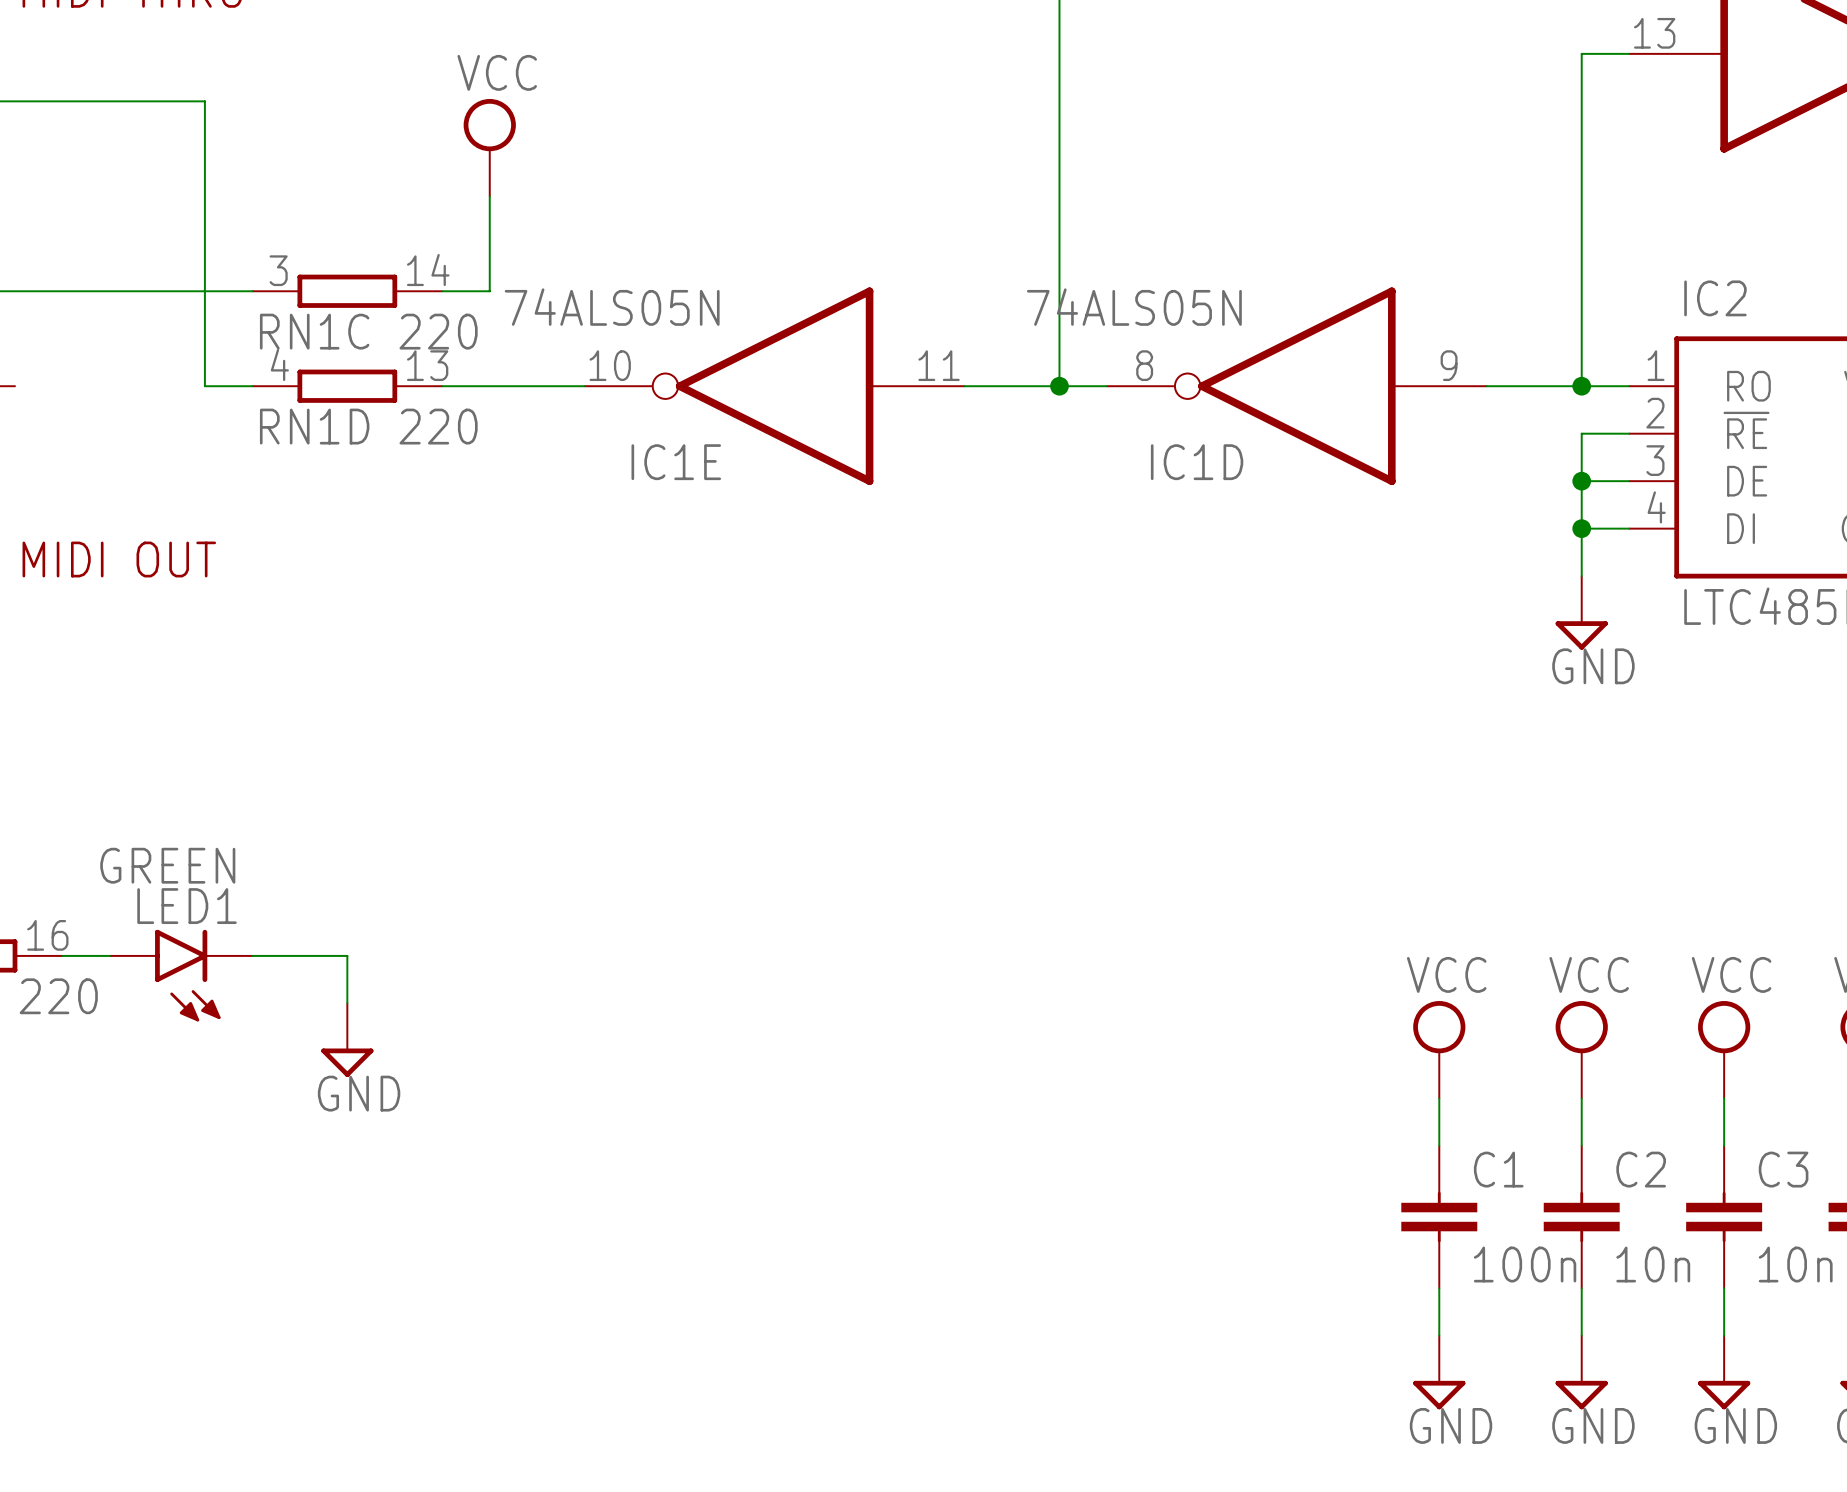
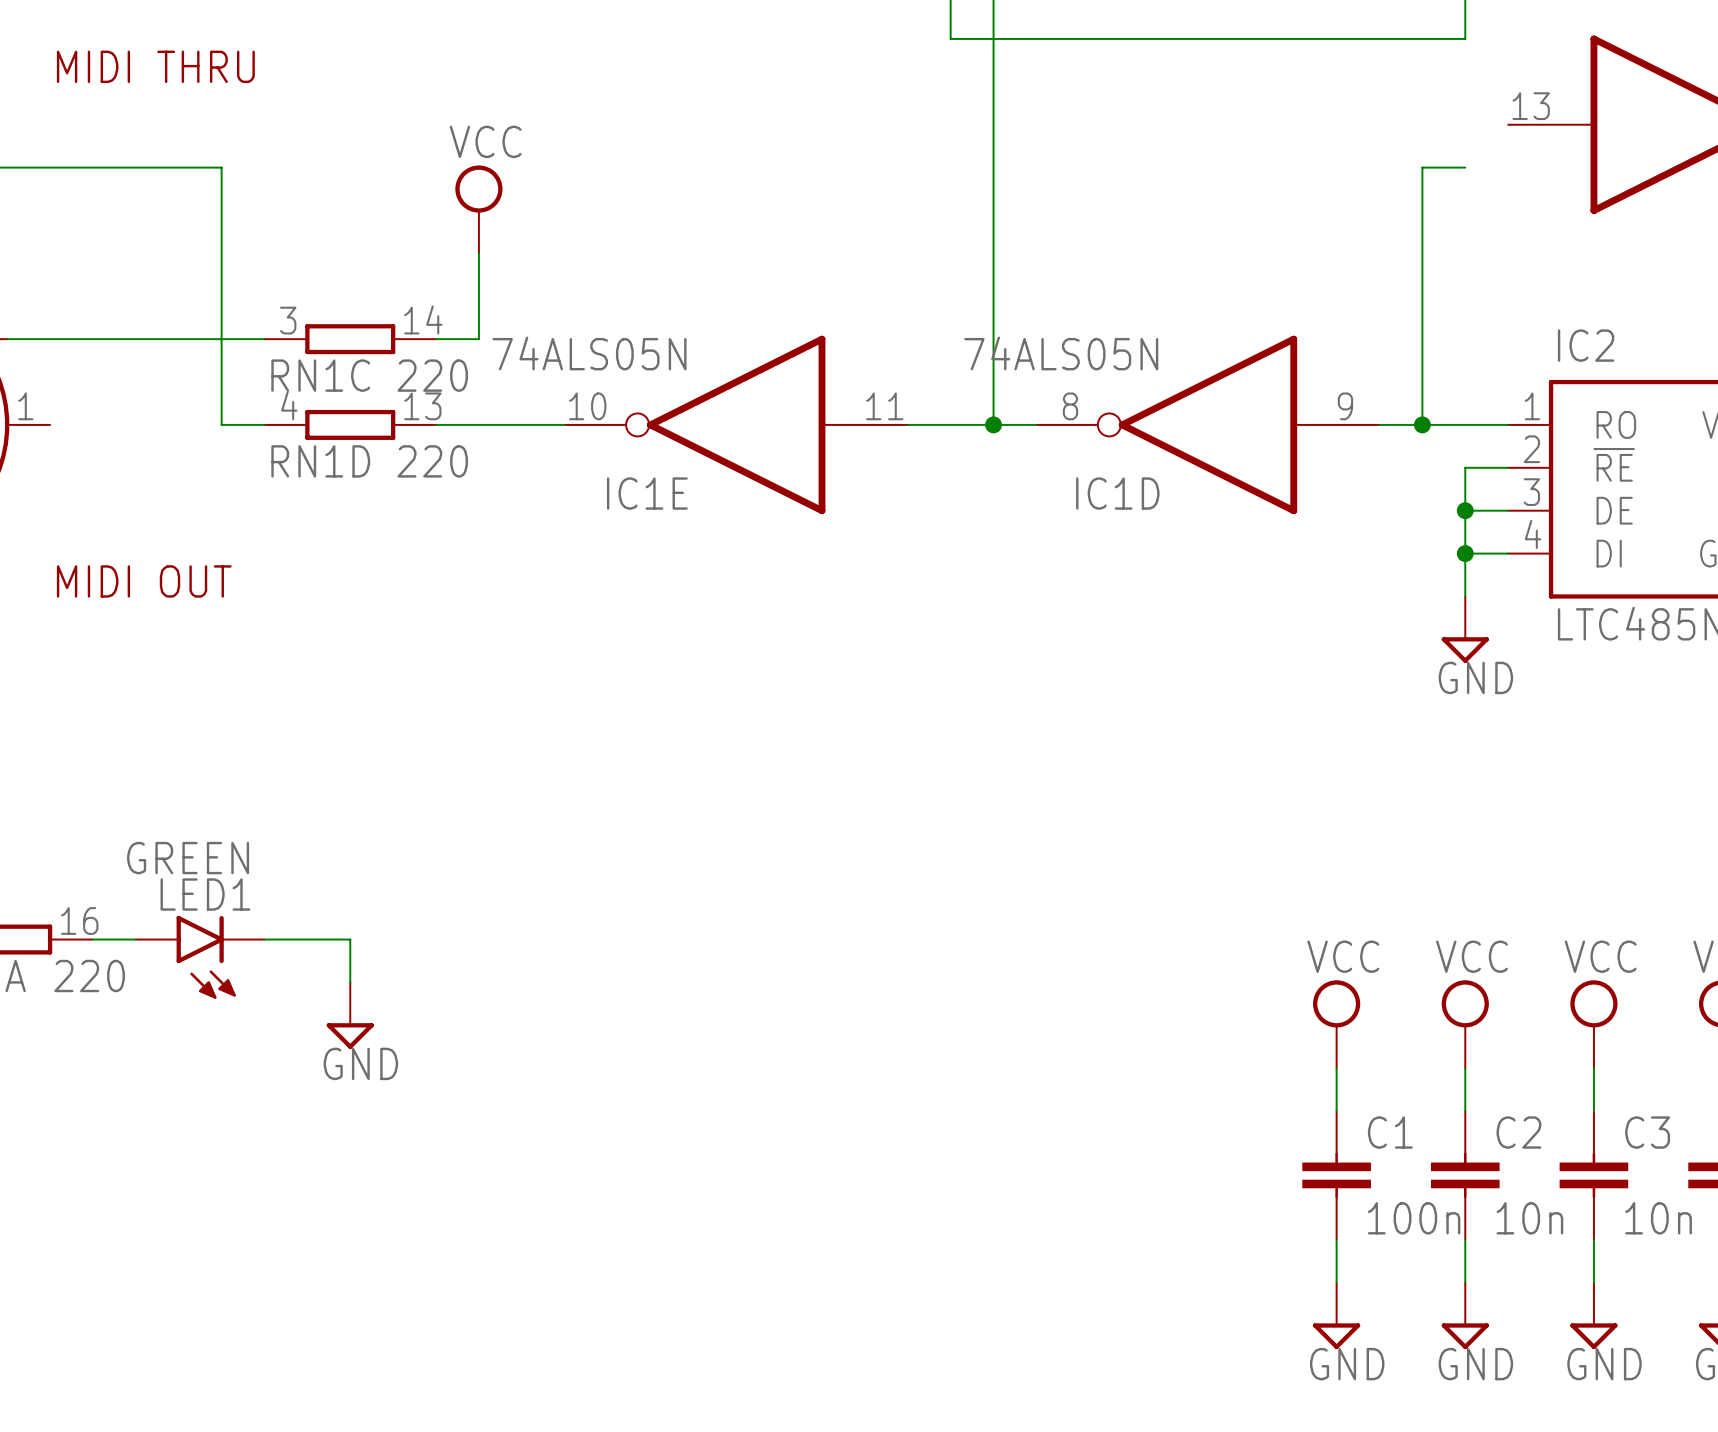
wire: (1629, 53) (1581, 53) (1581, 386) -> none
wire: none -> (1465, 167) (1422, 167) (1422, 424)
junction position: (1581, 386) -> (1422, 424)

